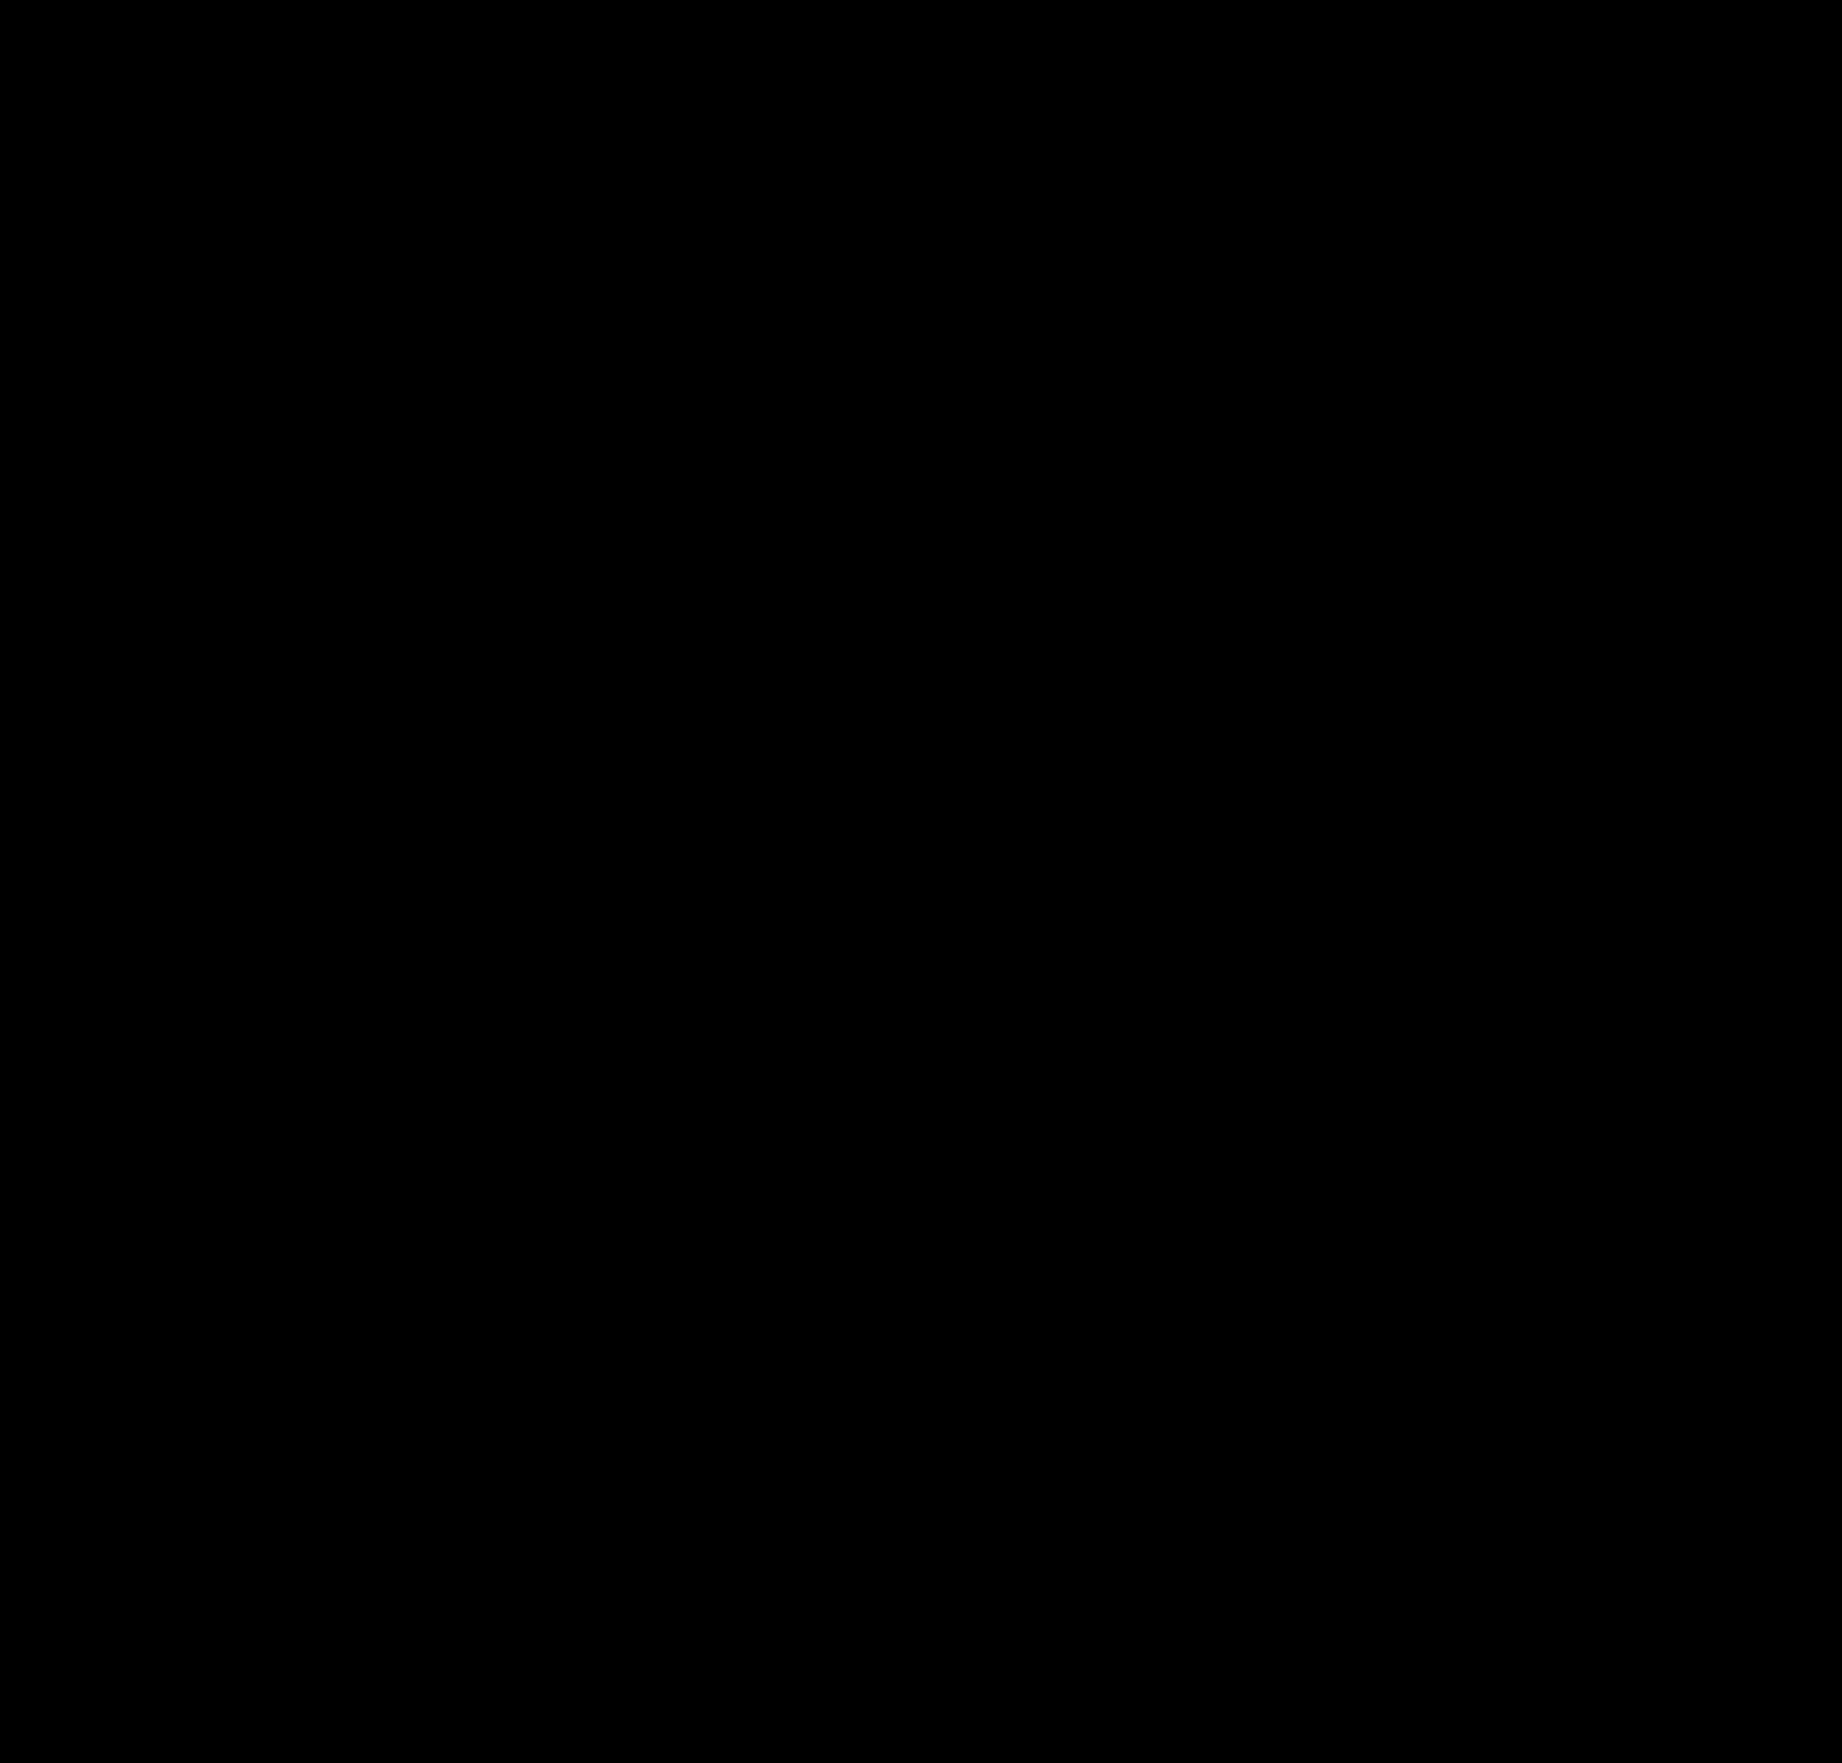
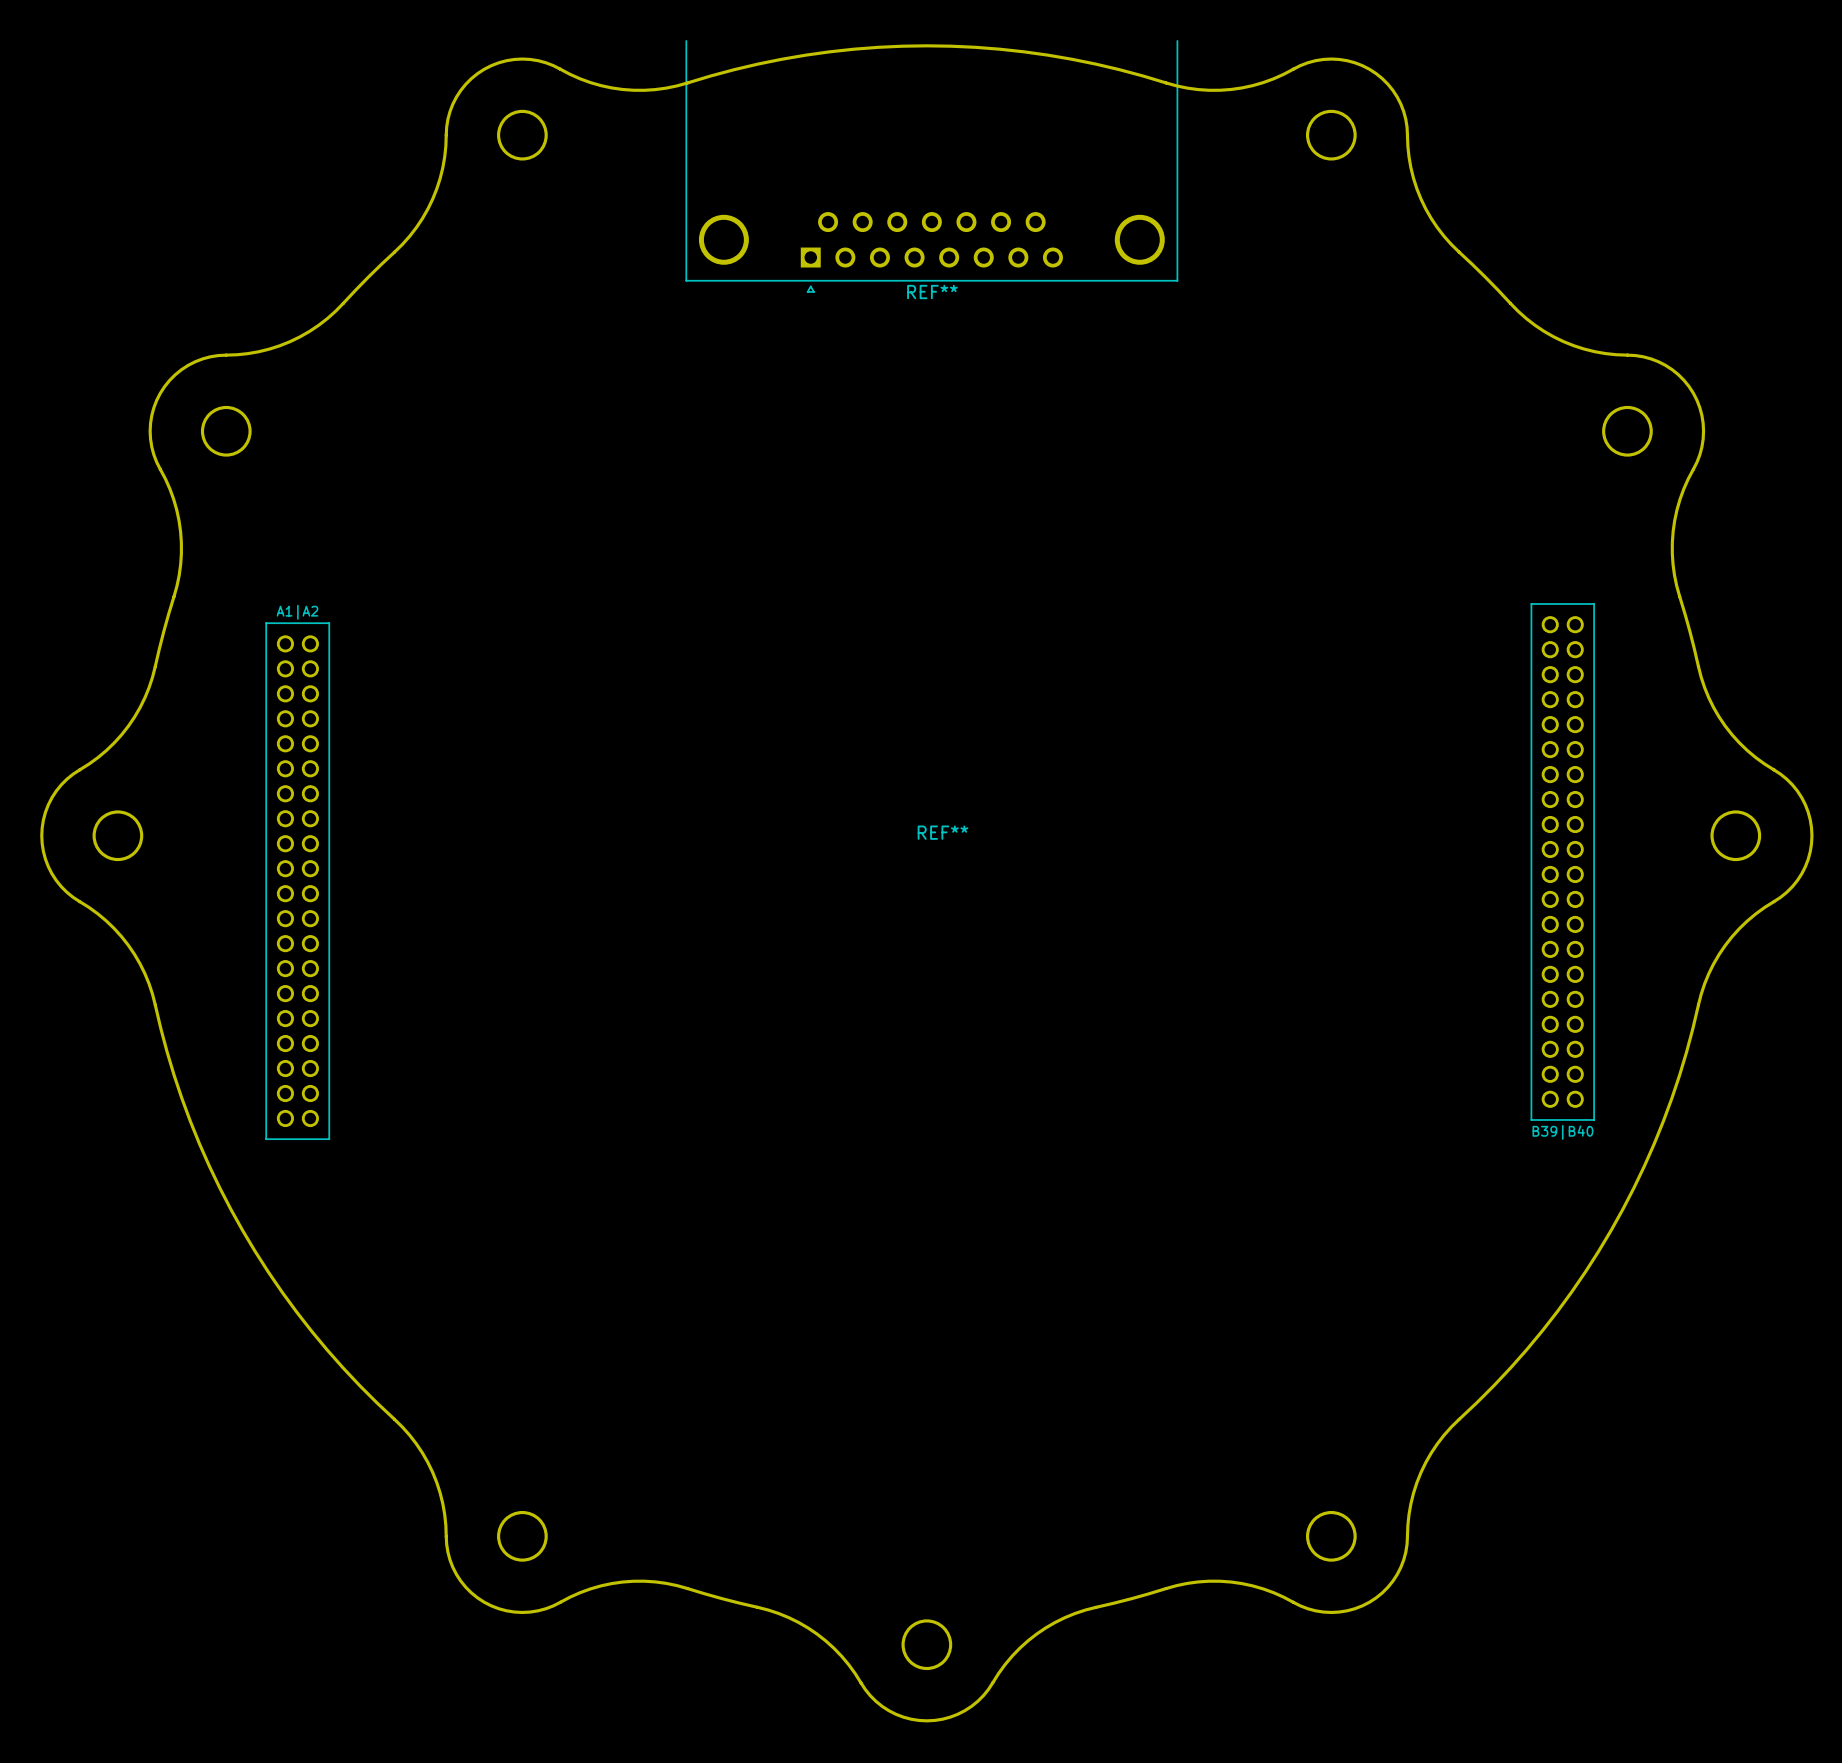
REF**: none -> (931, 166)
REF**: none -> (926, 883)

